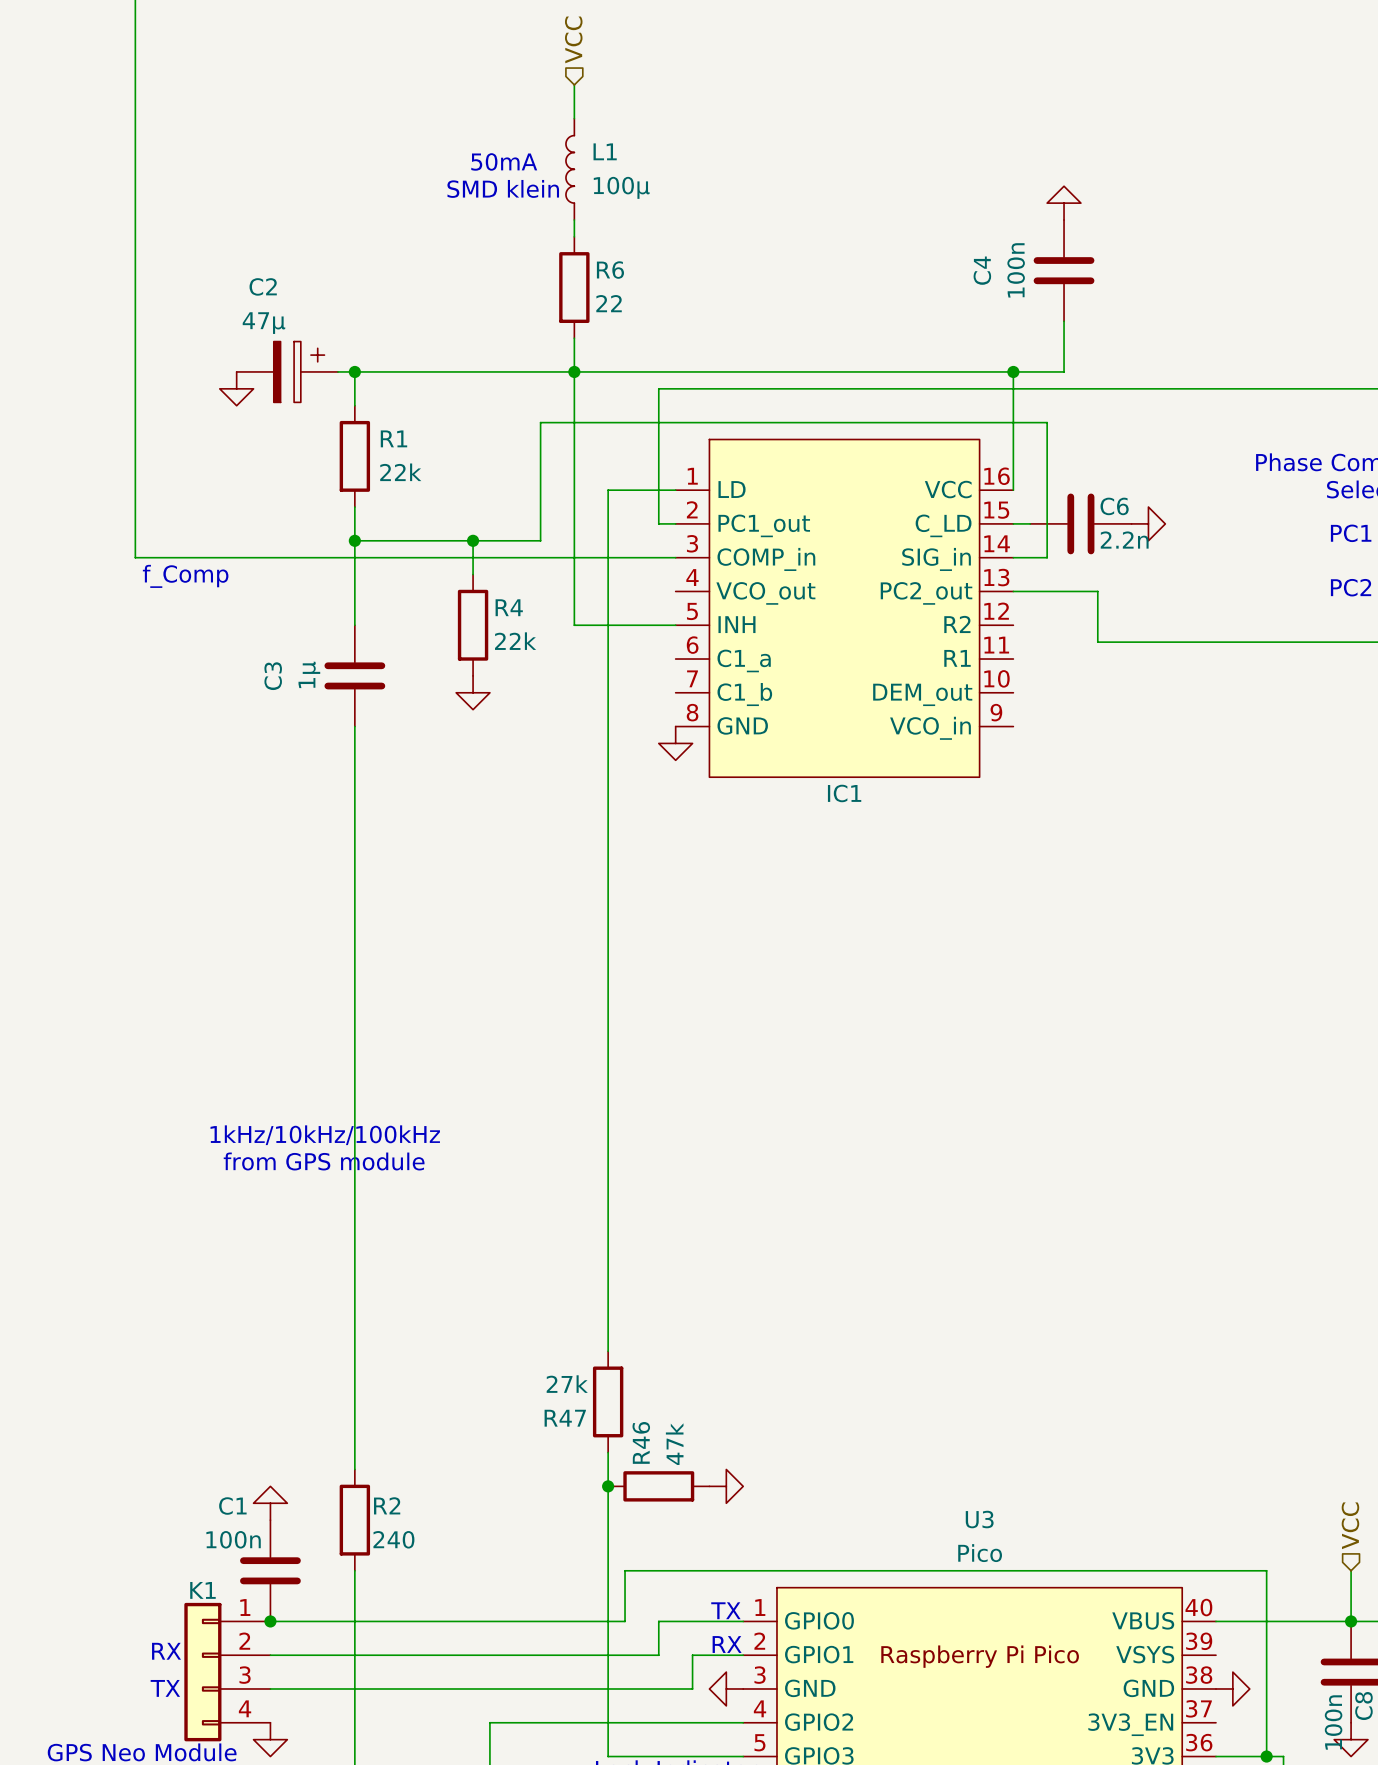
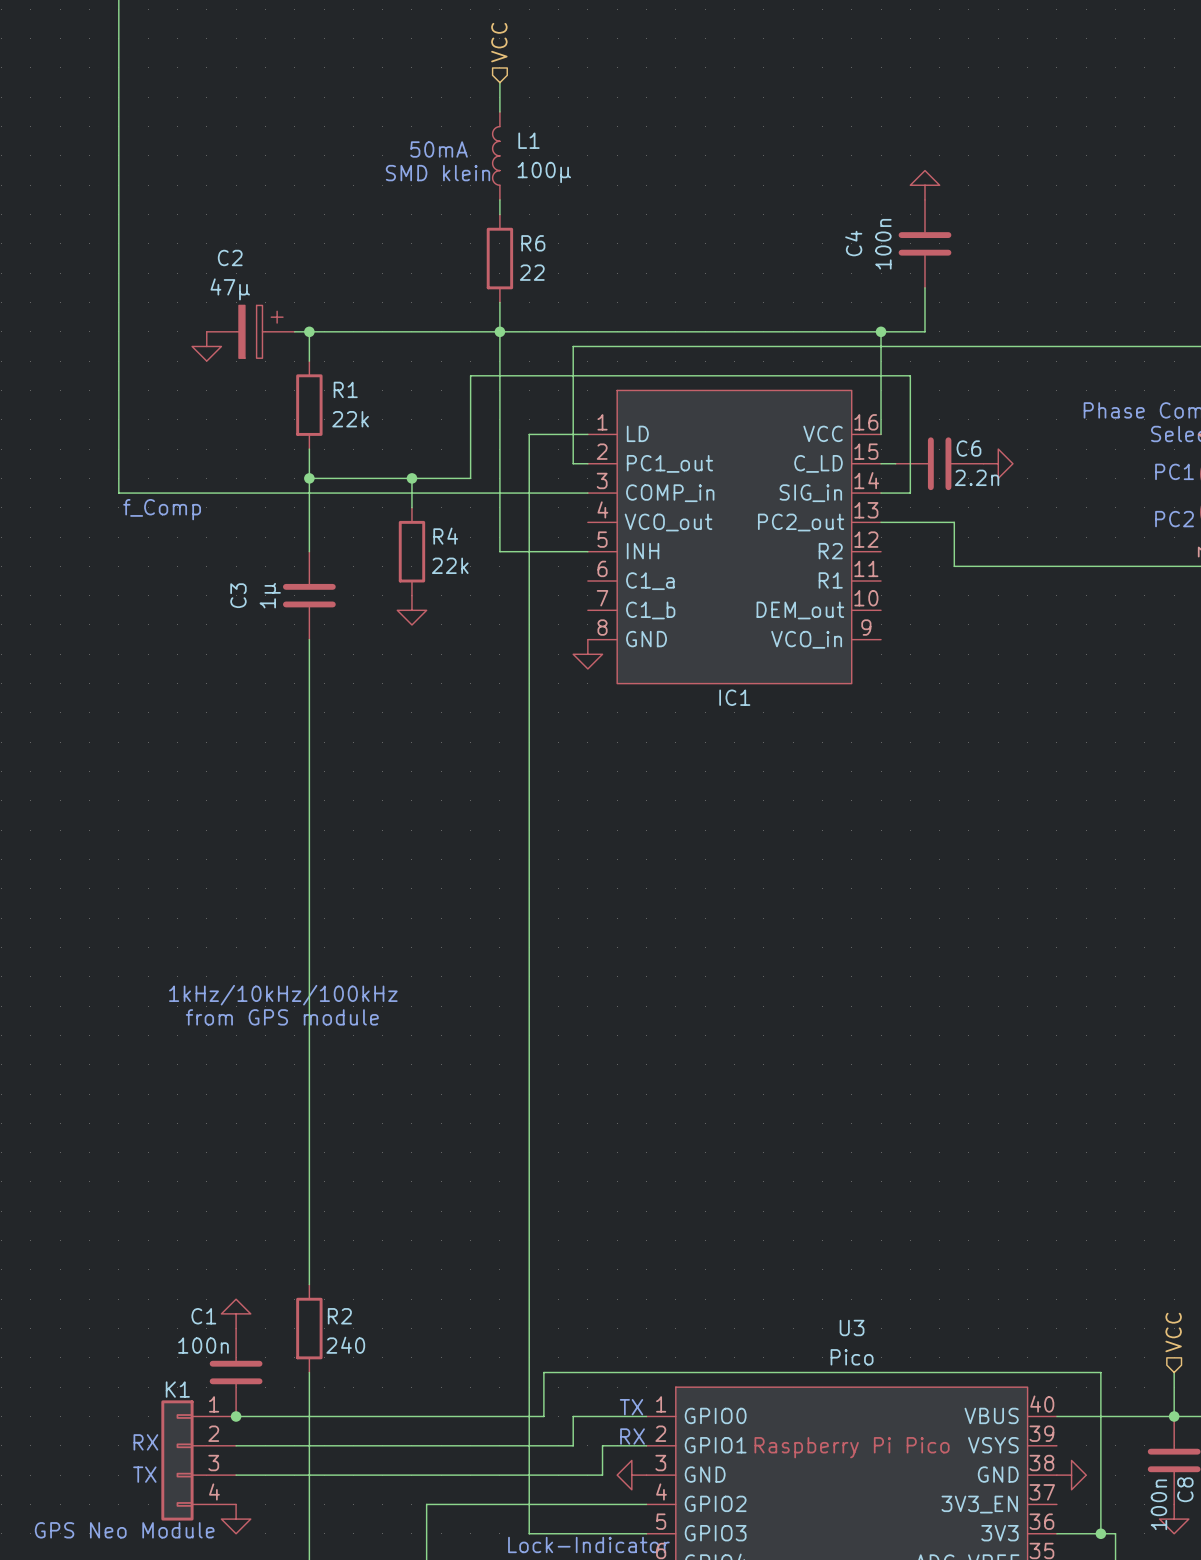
wire: none -> (529, 1181) (529, 1269)
R47: 27k (608, 1401) -> none
junction: (608, 1486) -> none
R46: 47k (658, 1486) -> none
power symbol: (726, 1486) -> none

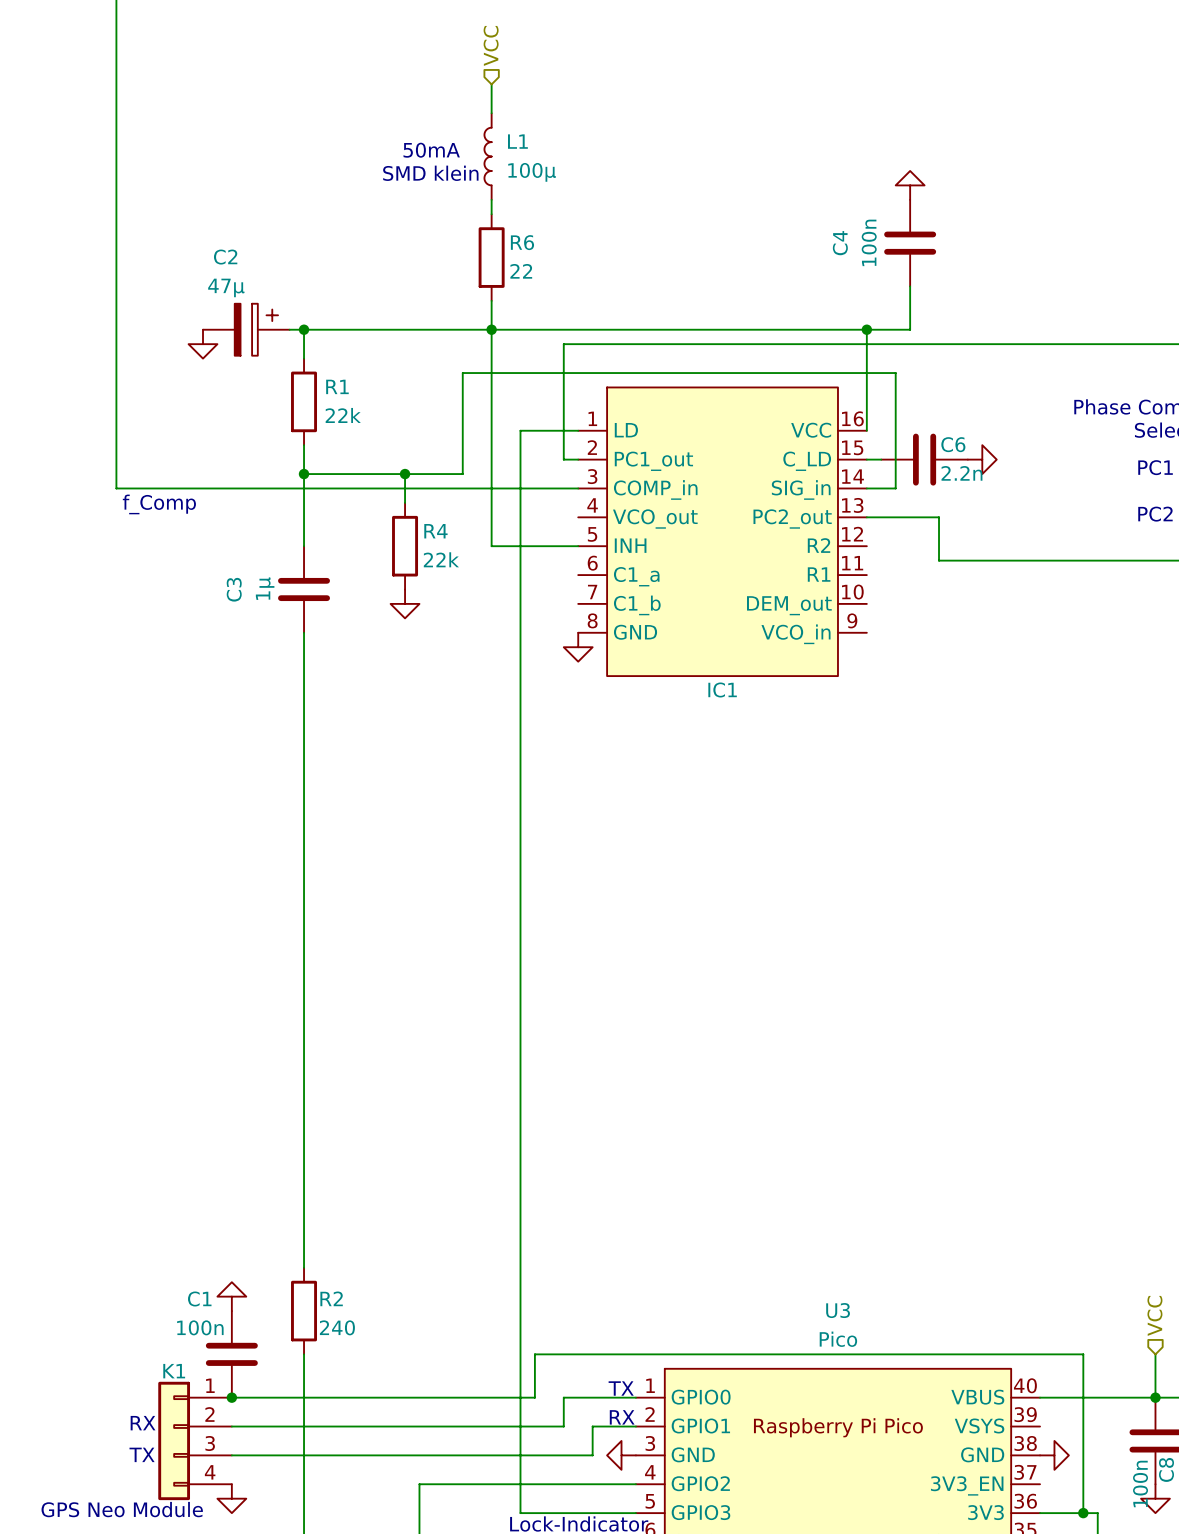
text: 1kHz/10kHz/100kHz (283, 995) -> none
text: from GPS module (282, 1017) -> none

